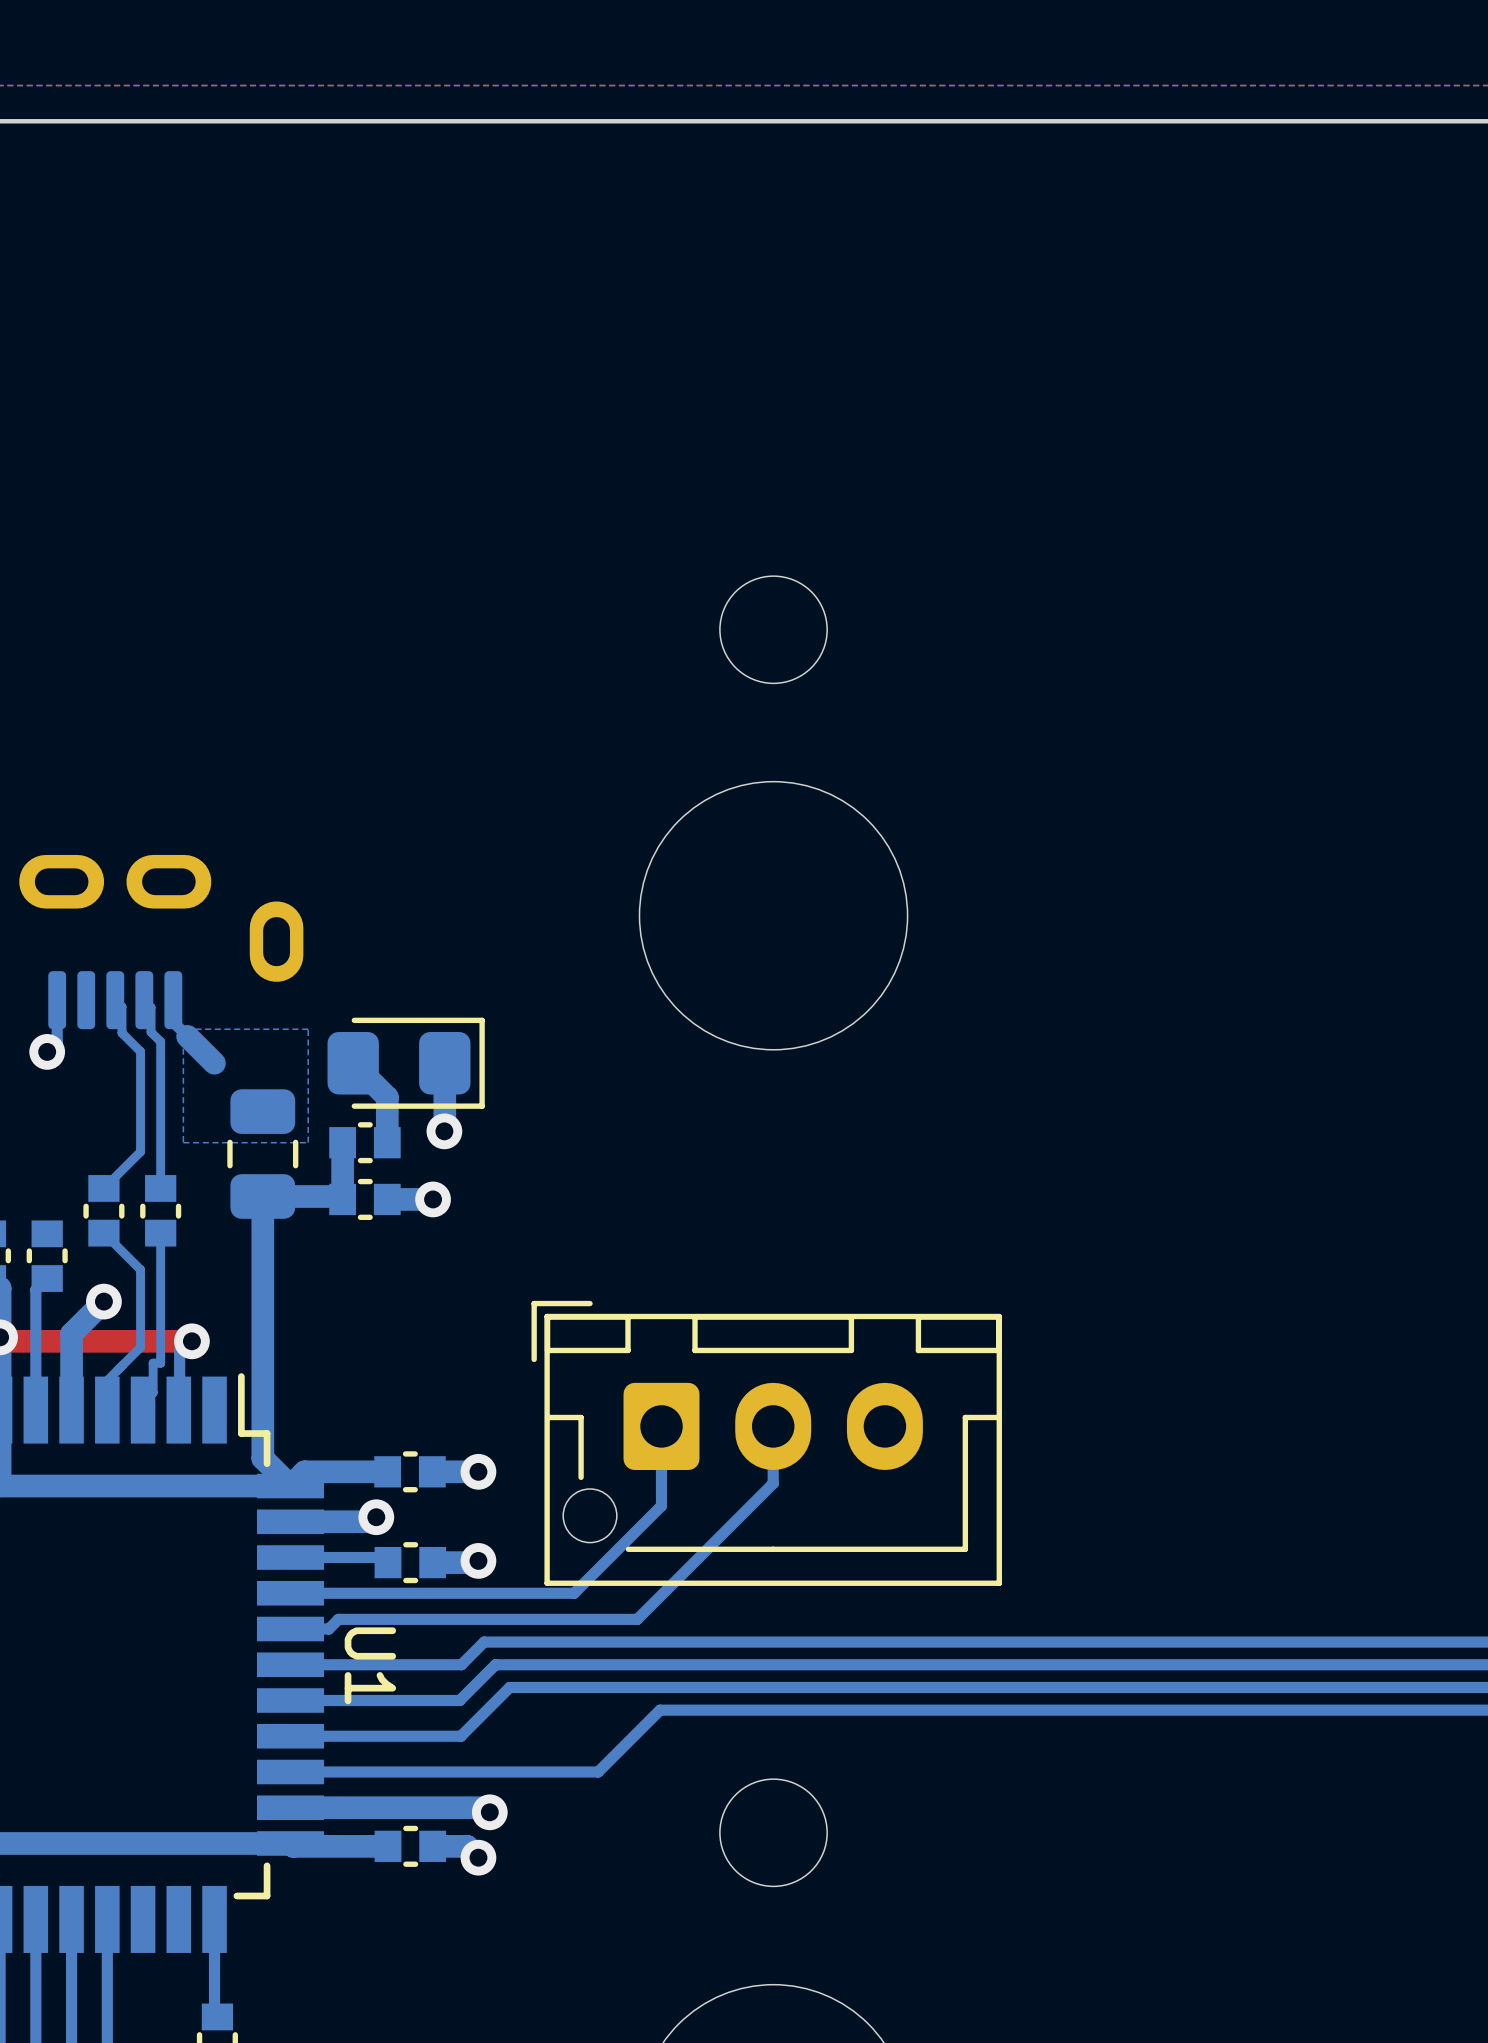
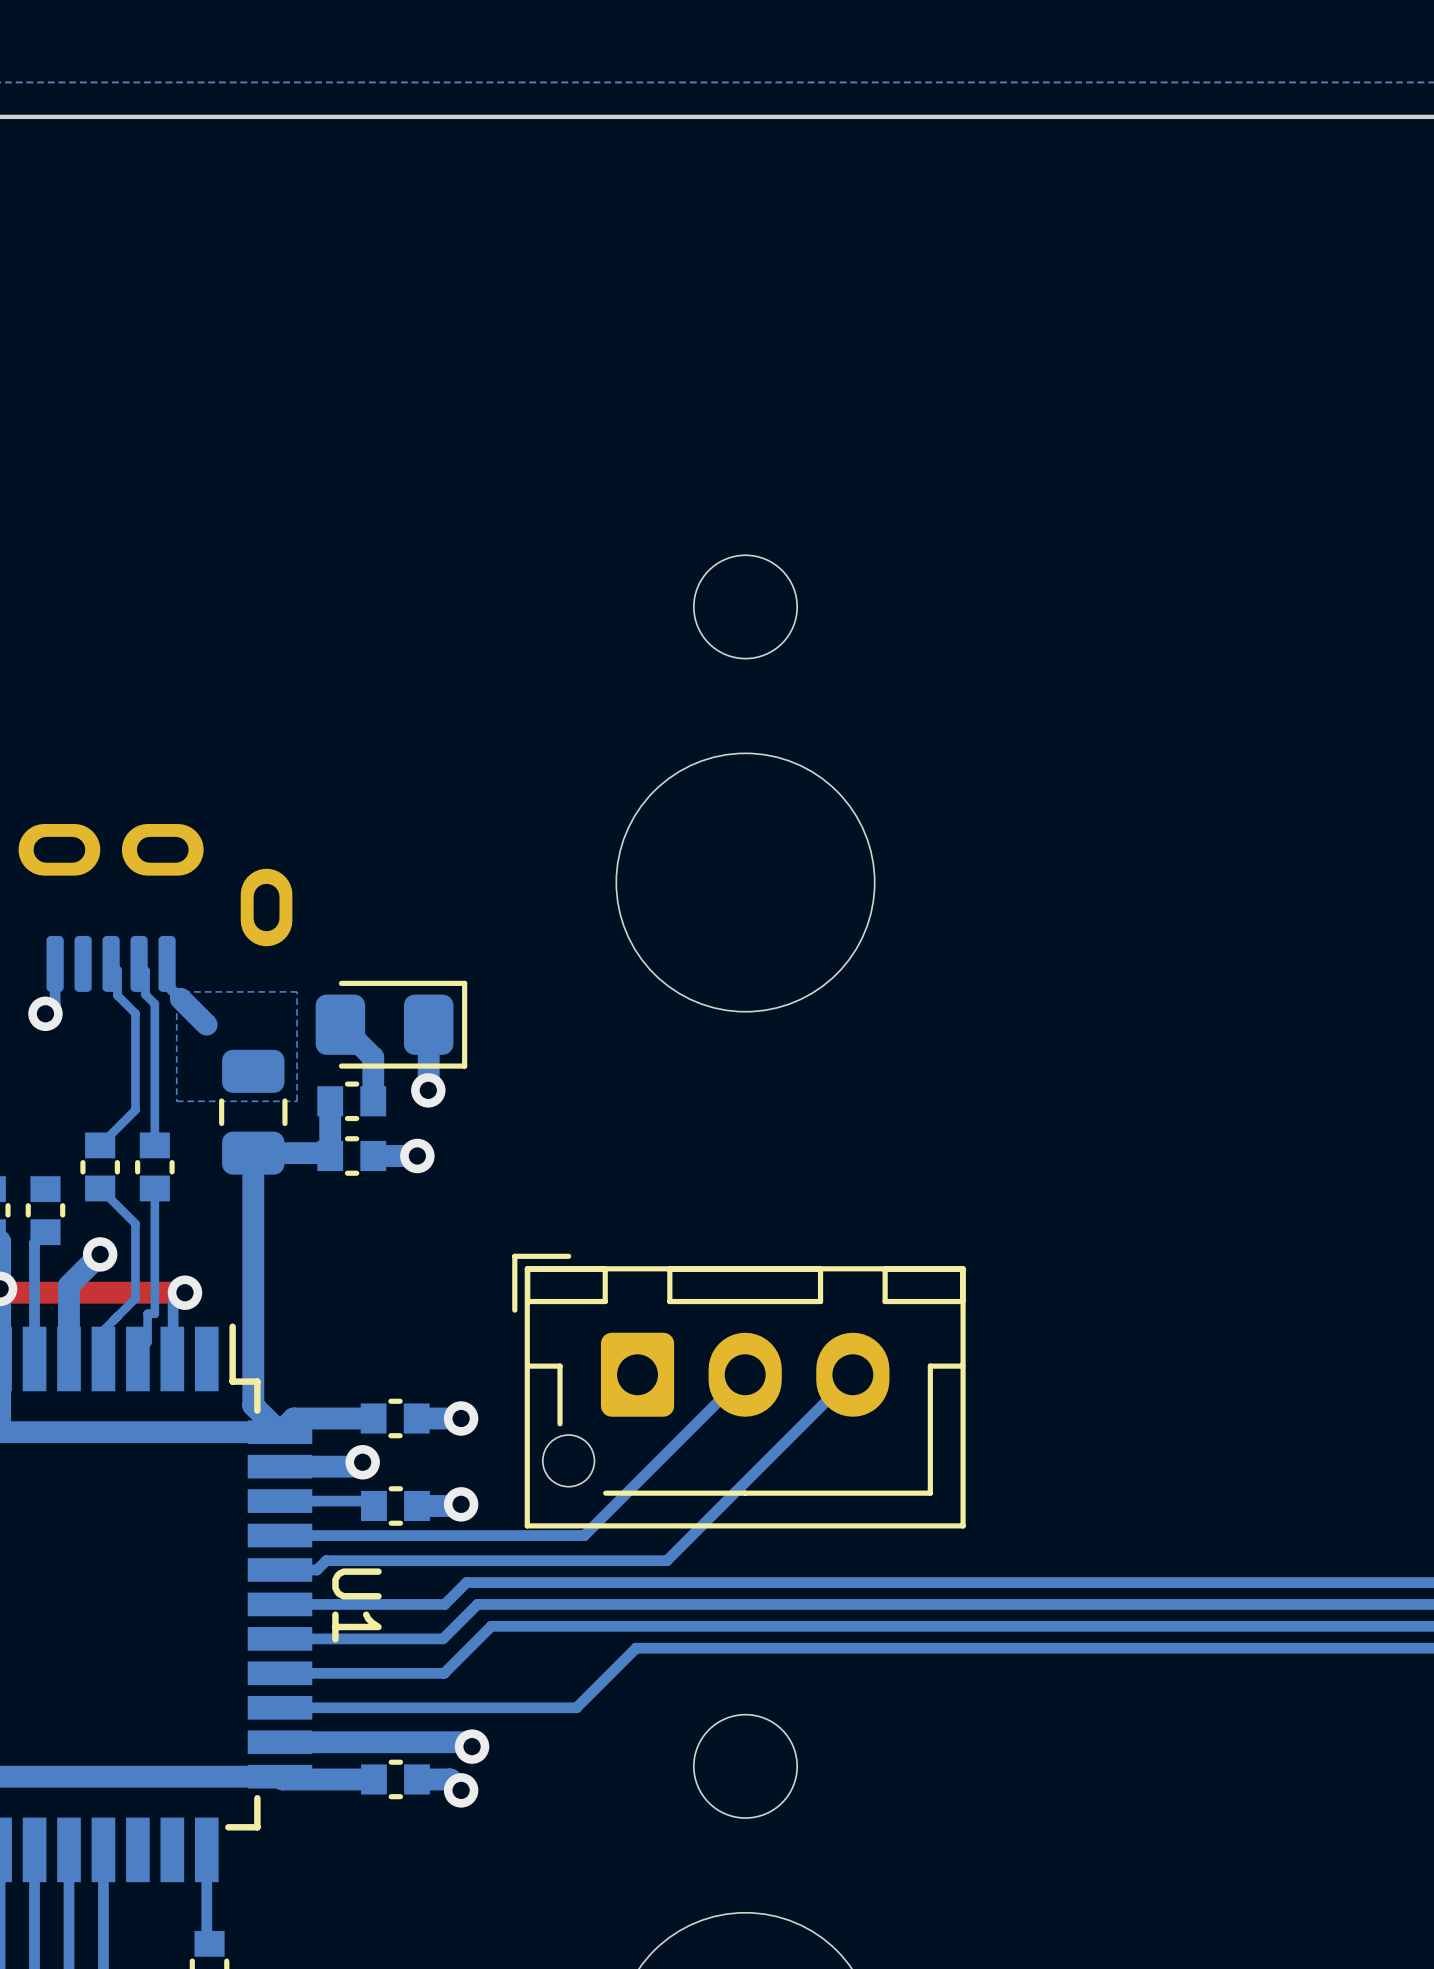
bottom track: (661, 1426) (661, 1505) (574, 1593) -> none
bottom track: (773, 1426) (773, 1483) (637, 1619) -> (745, 1374) (584, 1535) (553, 1535)
bottom track: none -> (852, 1374) (666, 1560) (614, 1560)

